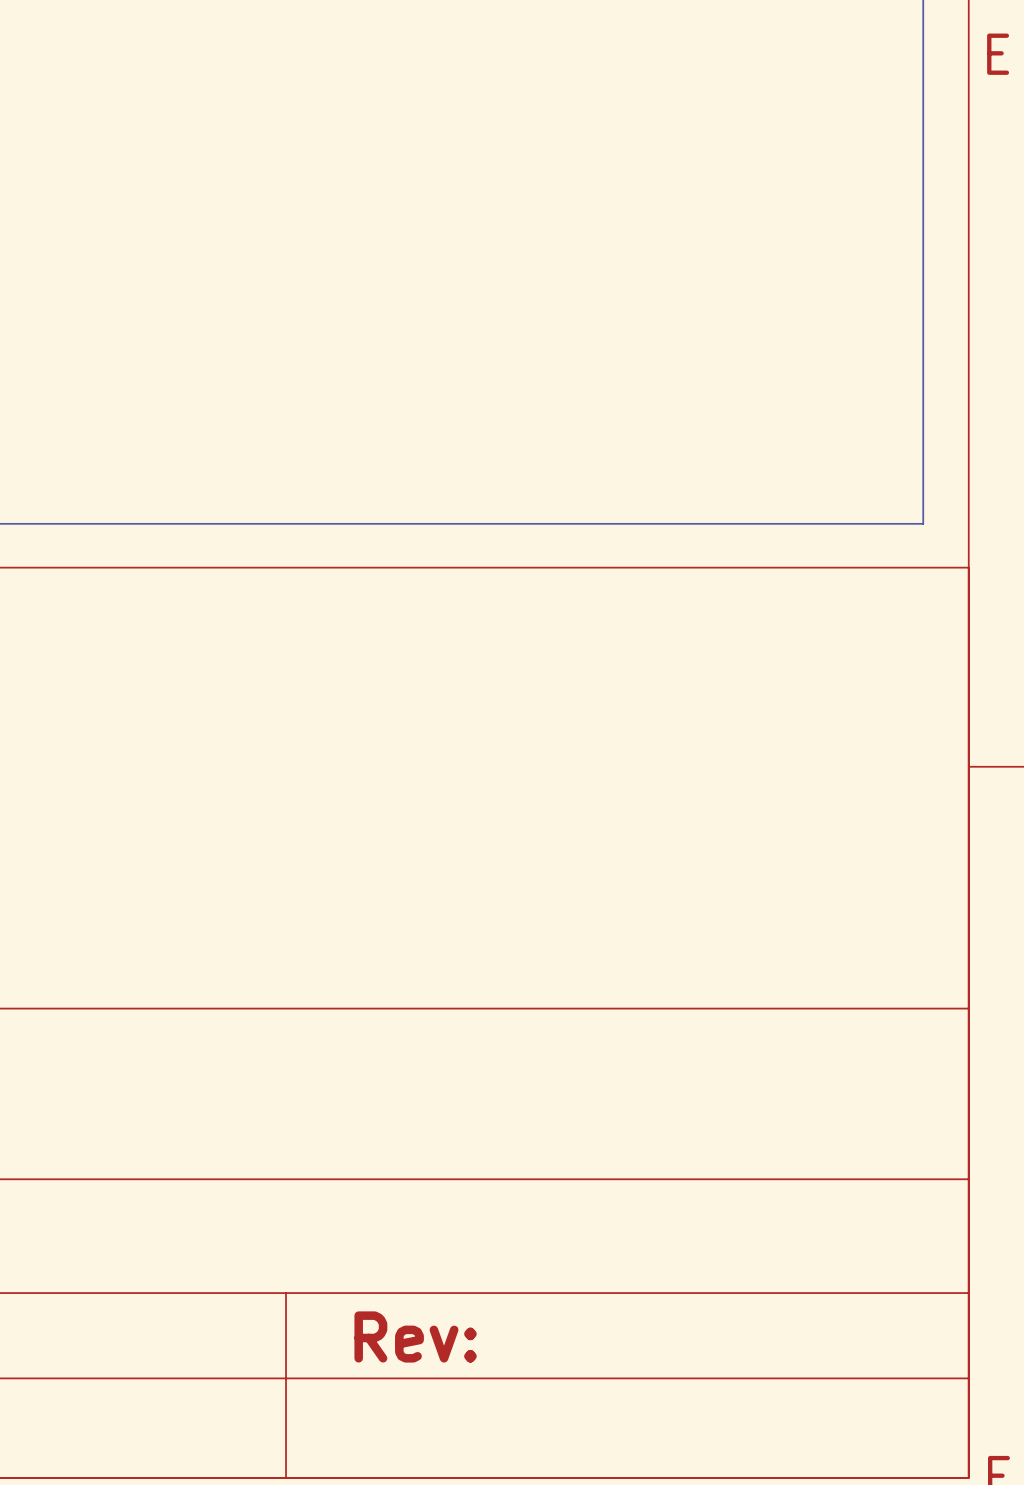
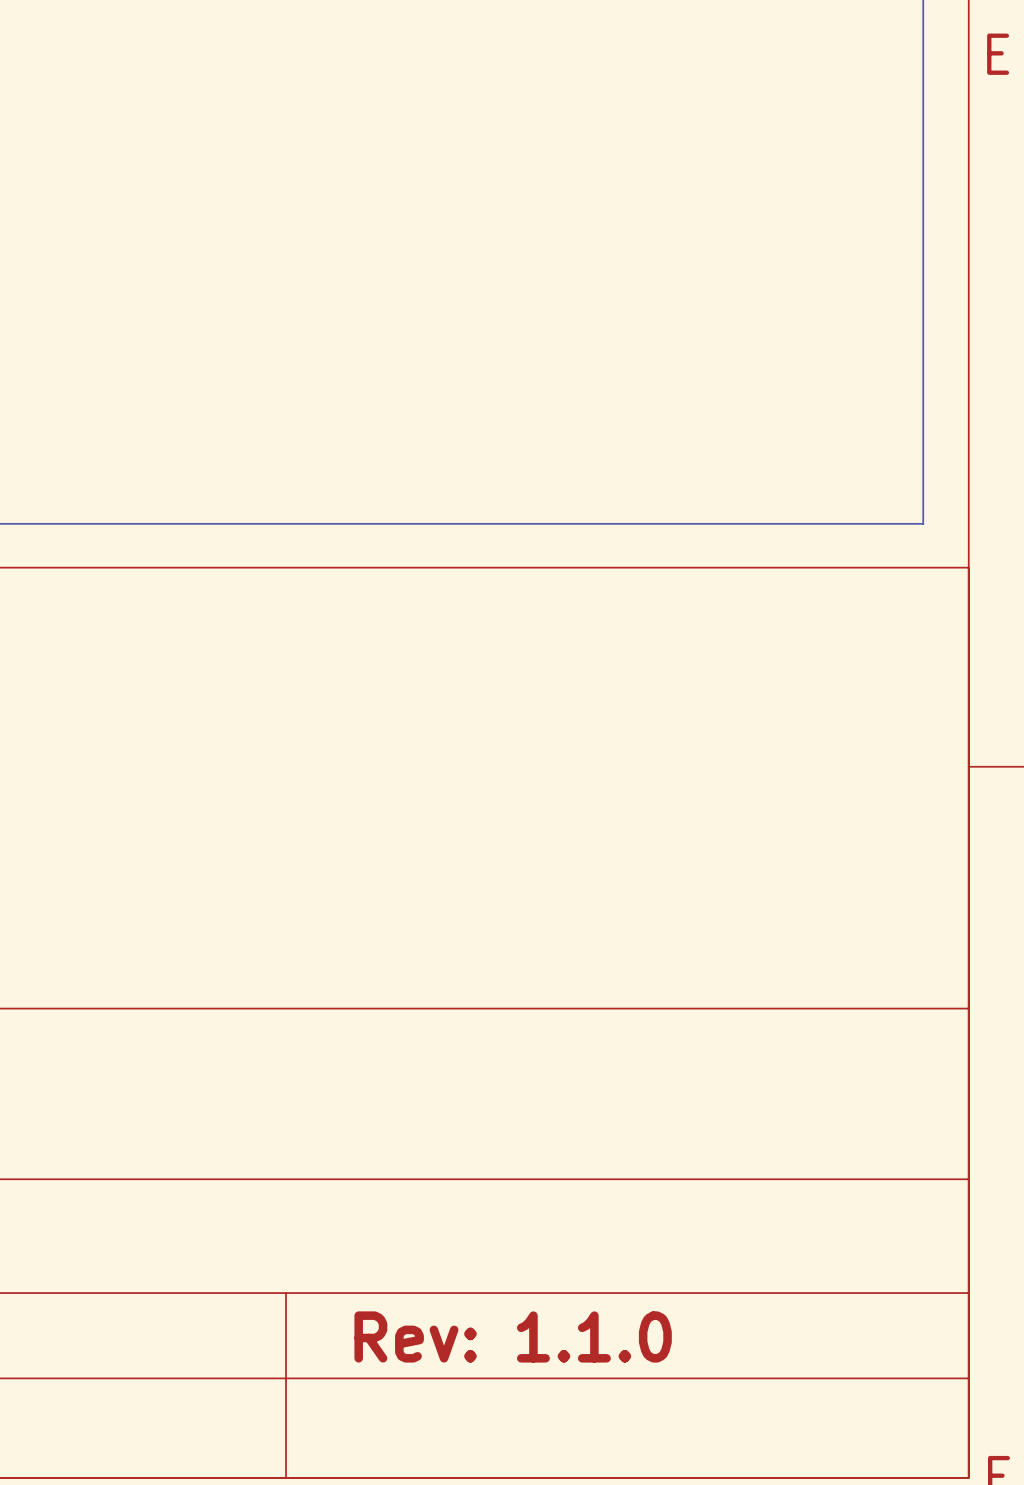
title block: Rev: (415, 1336) -> Rev: 1.1.0 (513, 1336)

